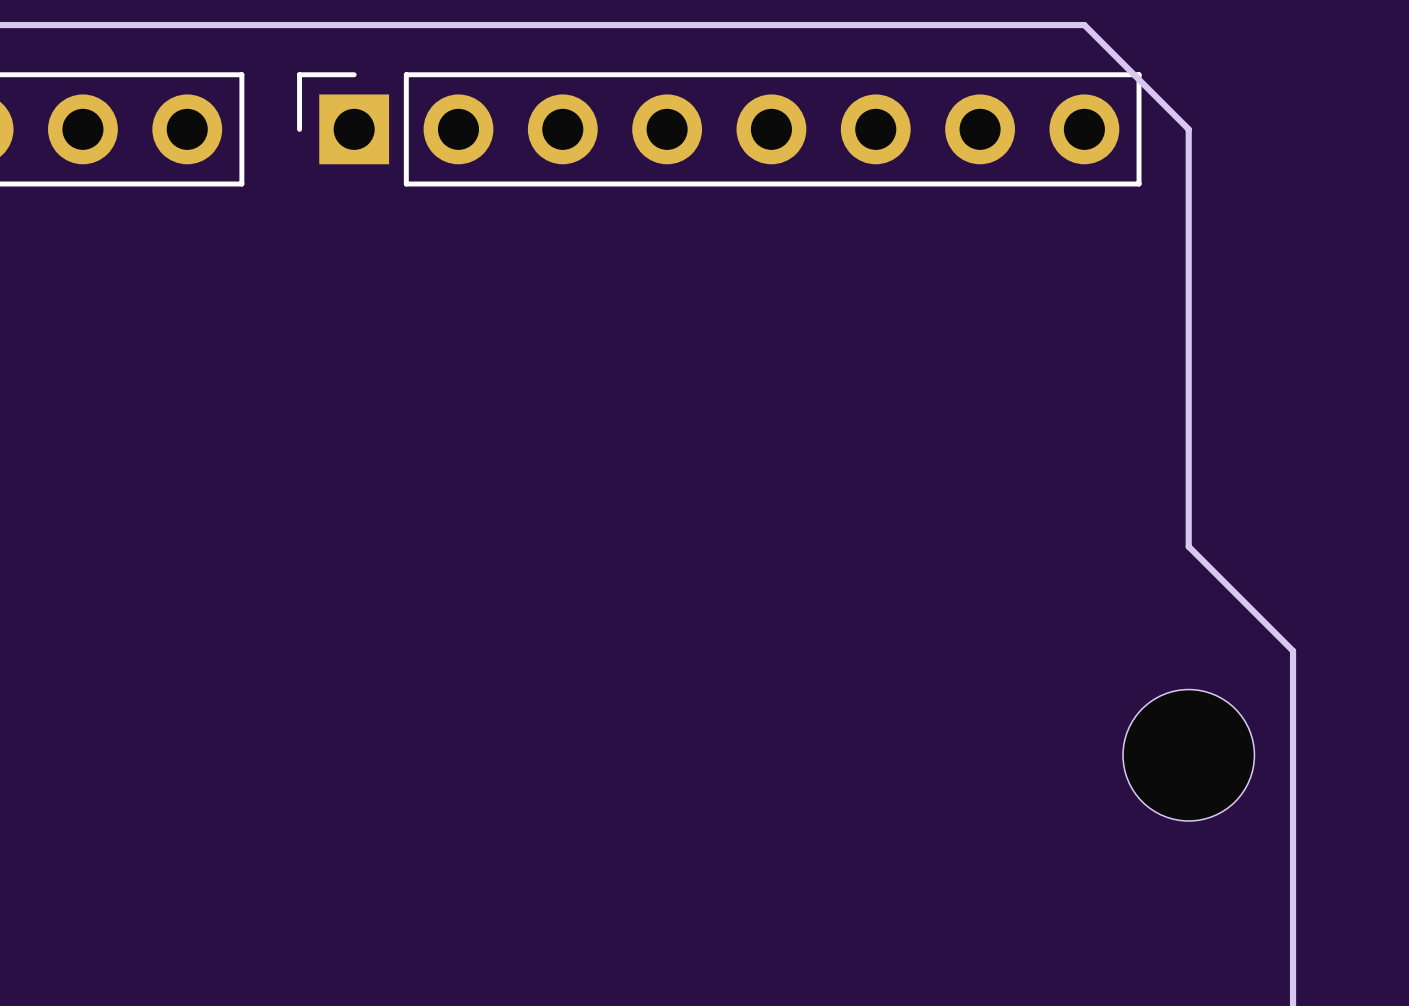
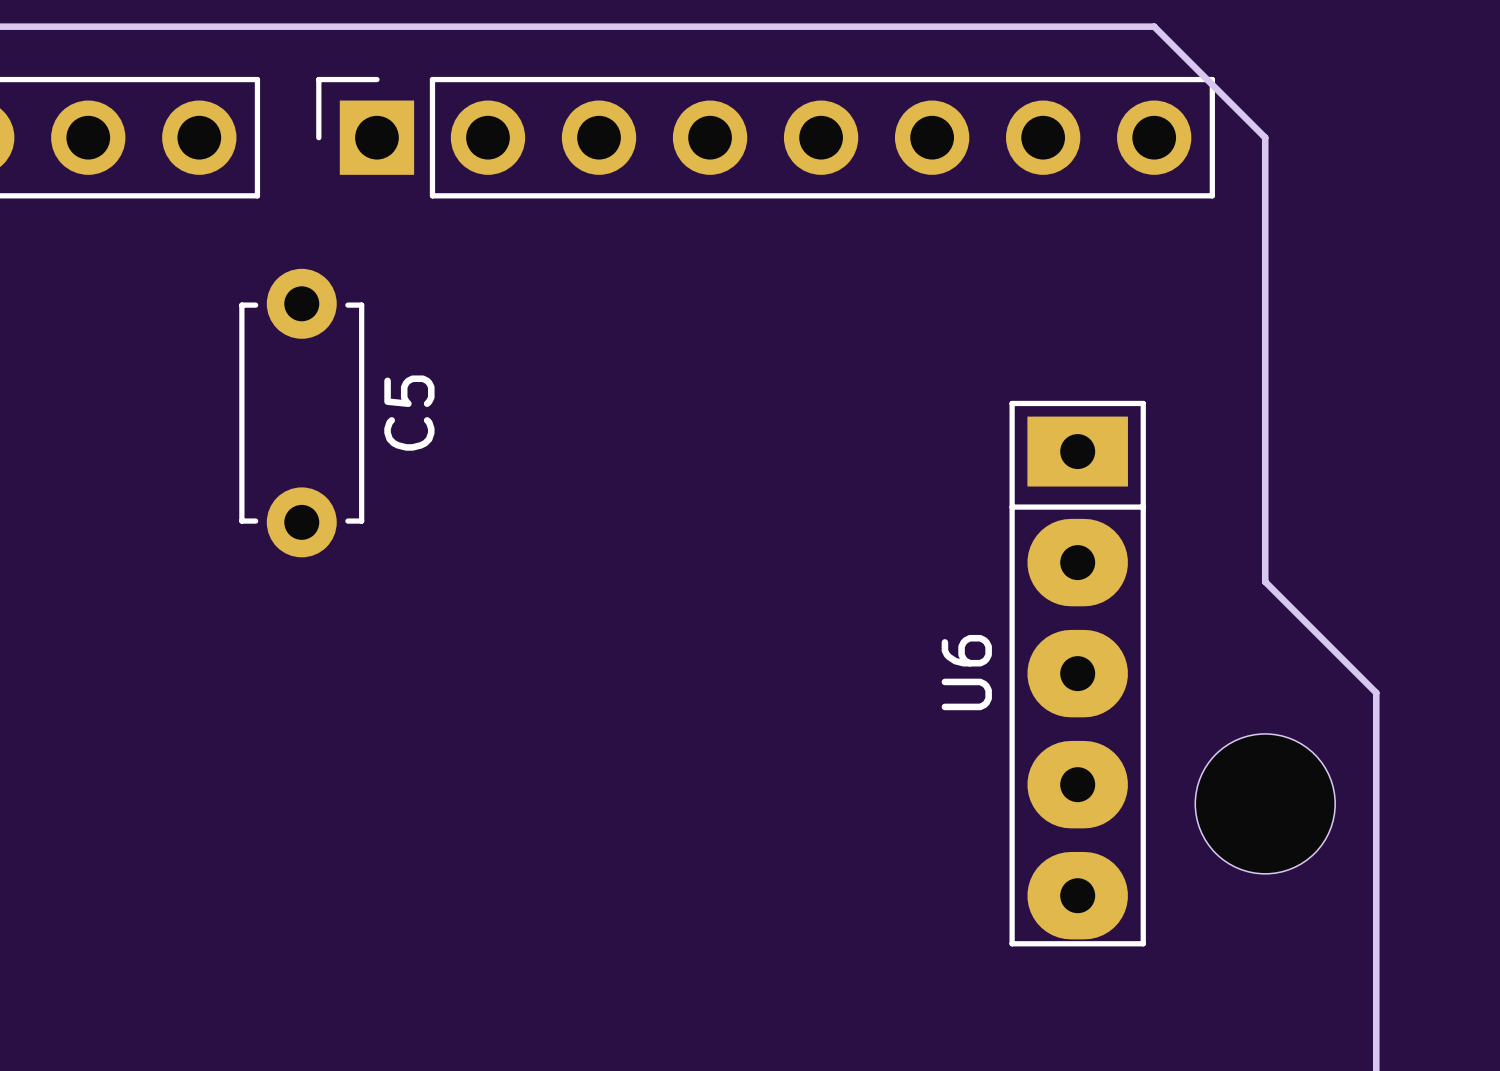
C5: none -> (301, 413)
U6: none -> (1077, 673)

